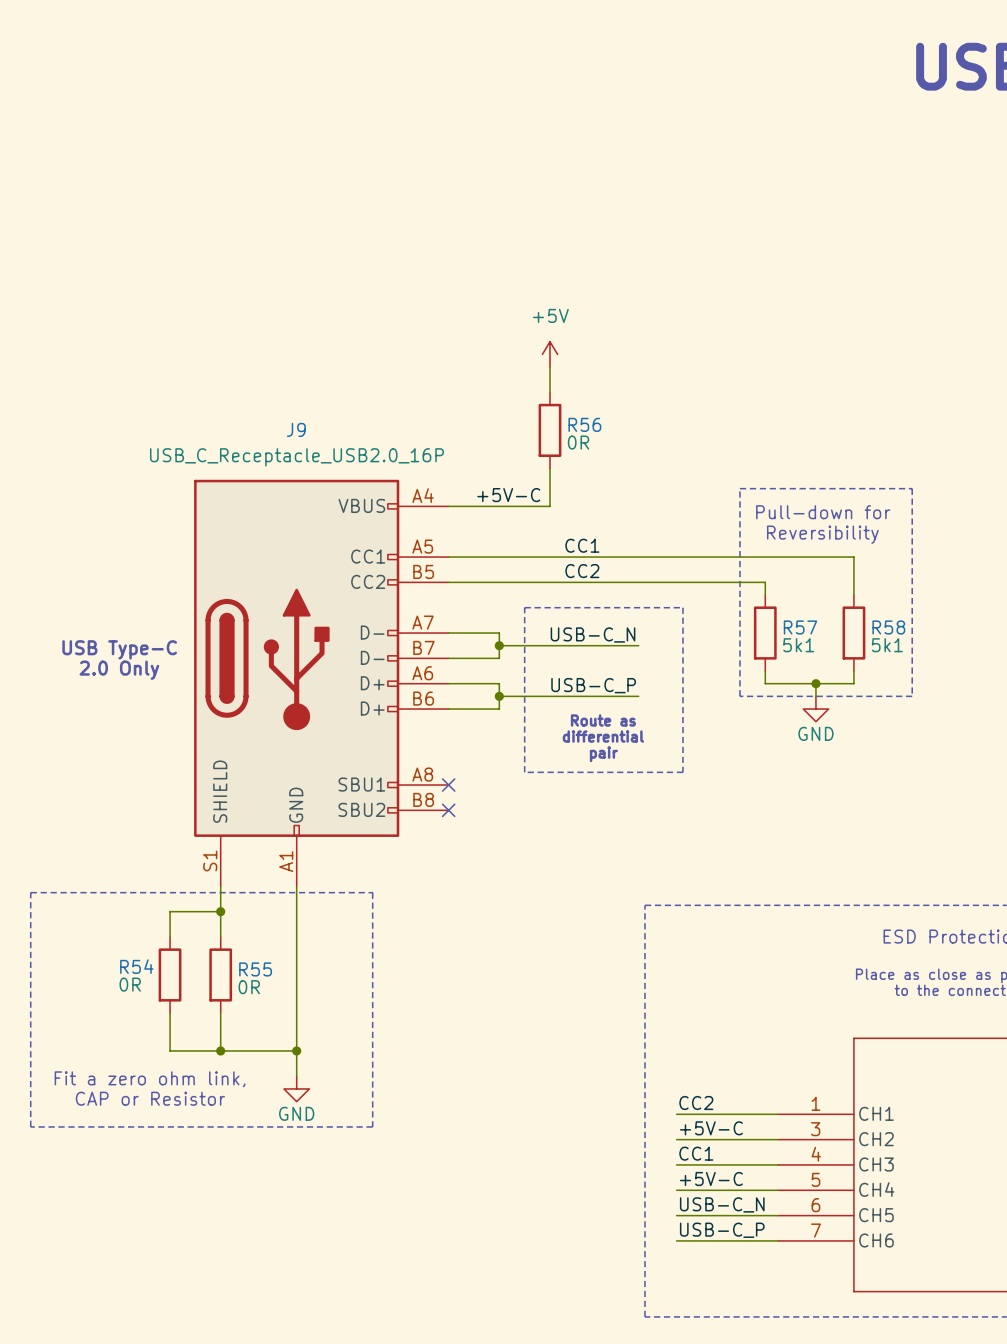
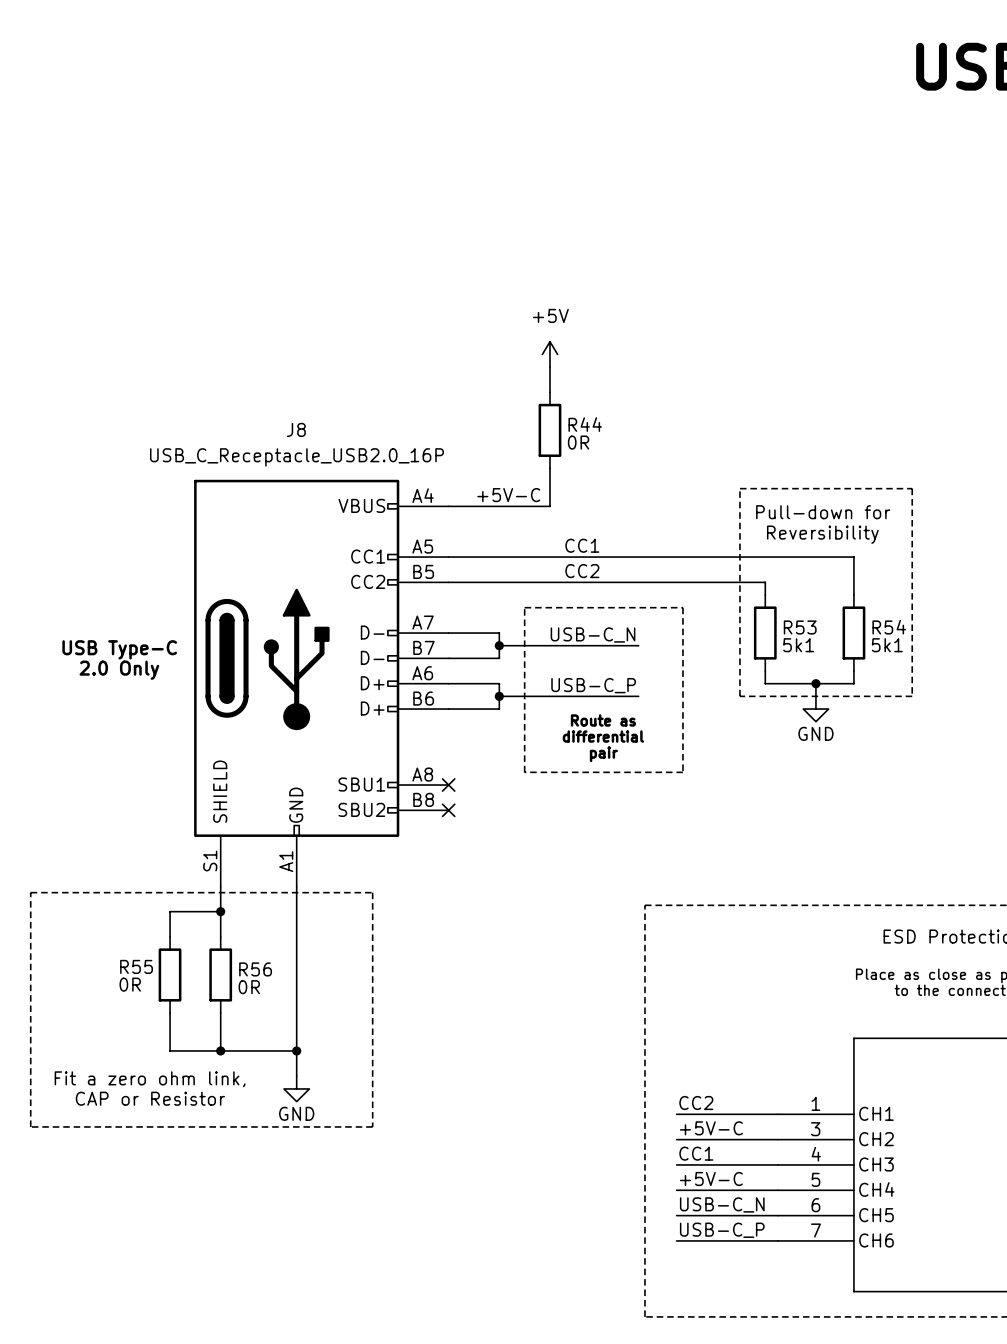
R56 name: R56 (584, 424) -> R44 (585, 424)
J9 name: J9 (296, 429) -> J8 (296, 429)
R57 name: R57 (800, 627) -> R53 (800, 627)
R58 name: R58 (888, 627) -> R54 (889, 627)
R54 name: R54 (136, 966) -> R55 (136, 966)
R55 name: R55 (255, 969) -> R56 (255, 969)

